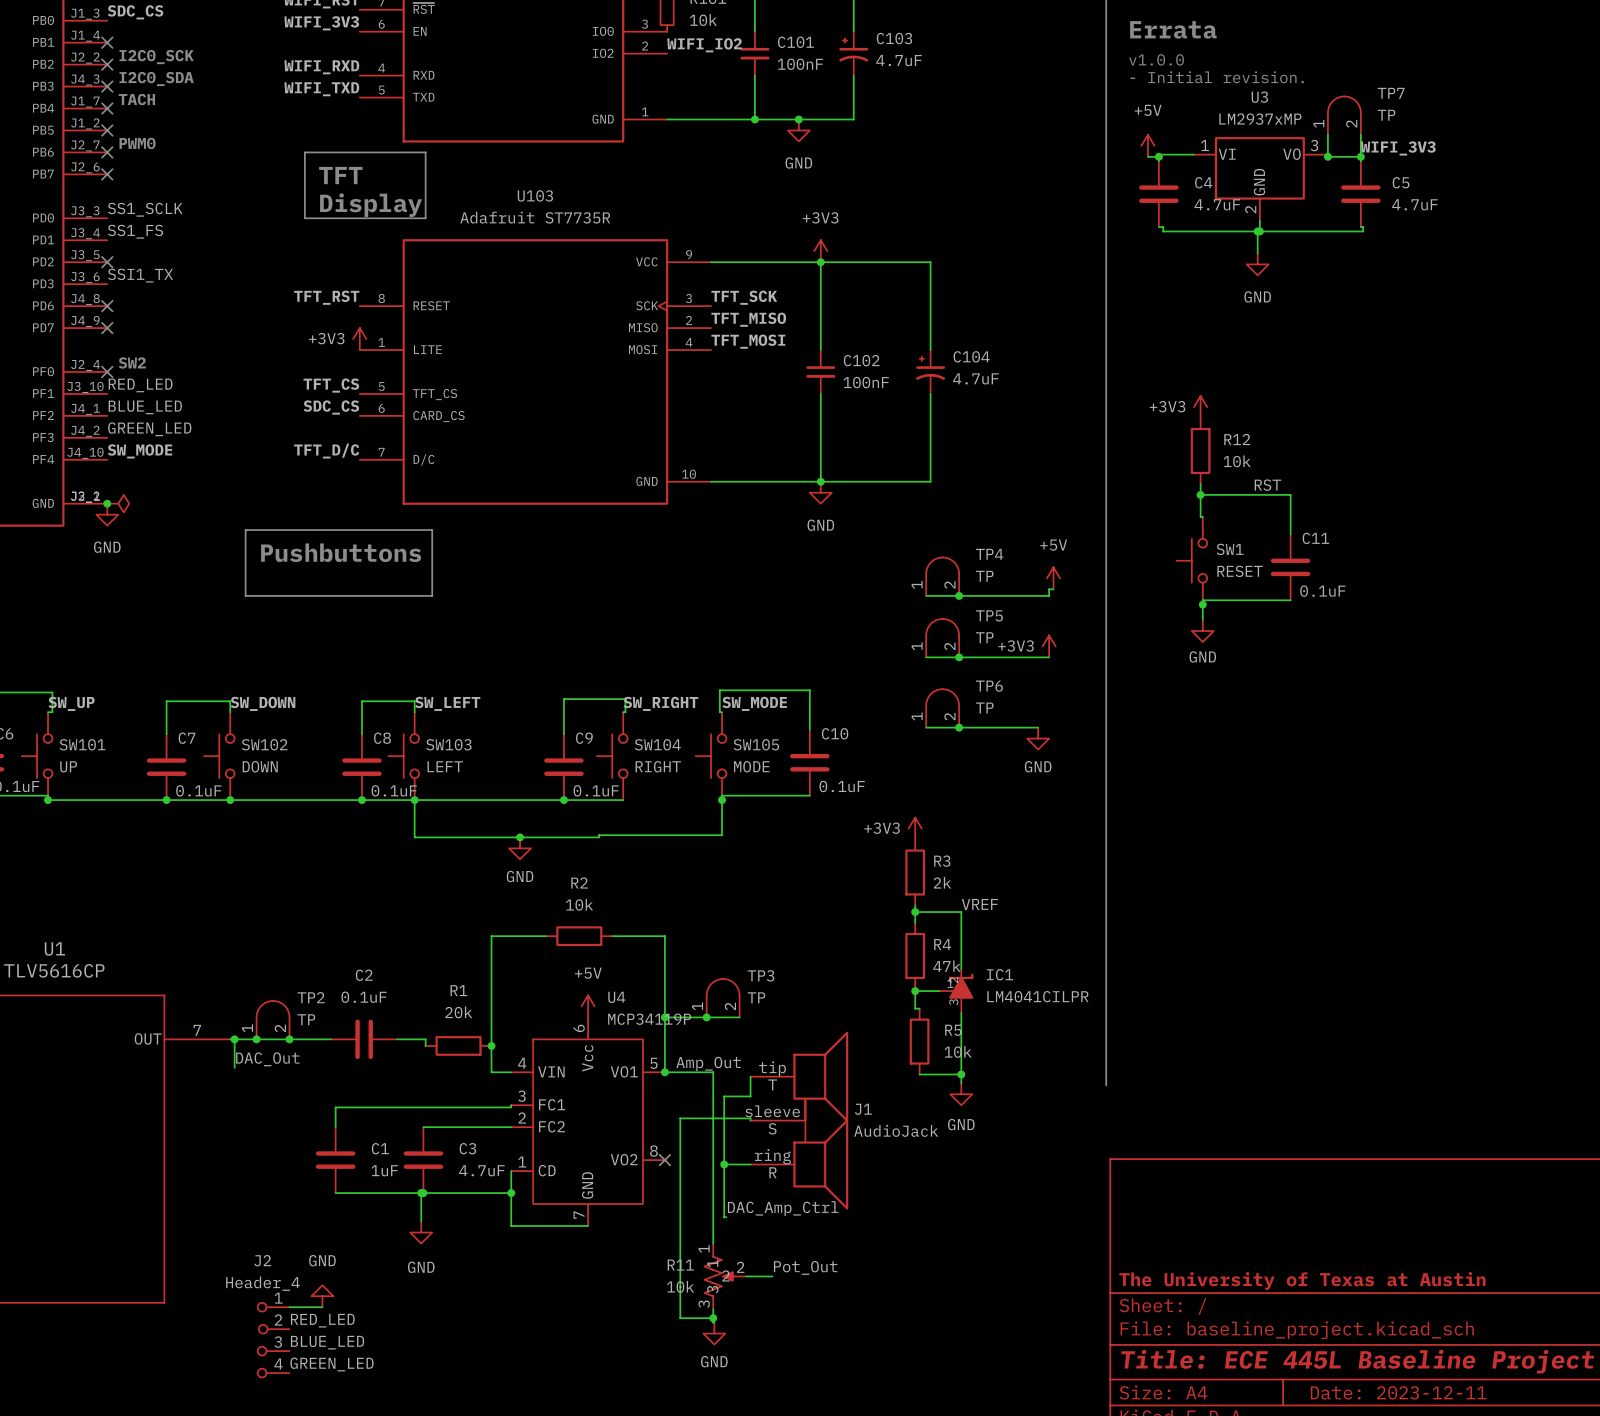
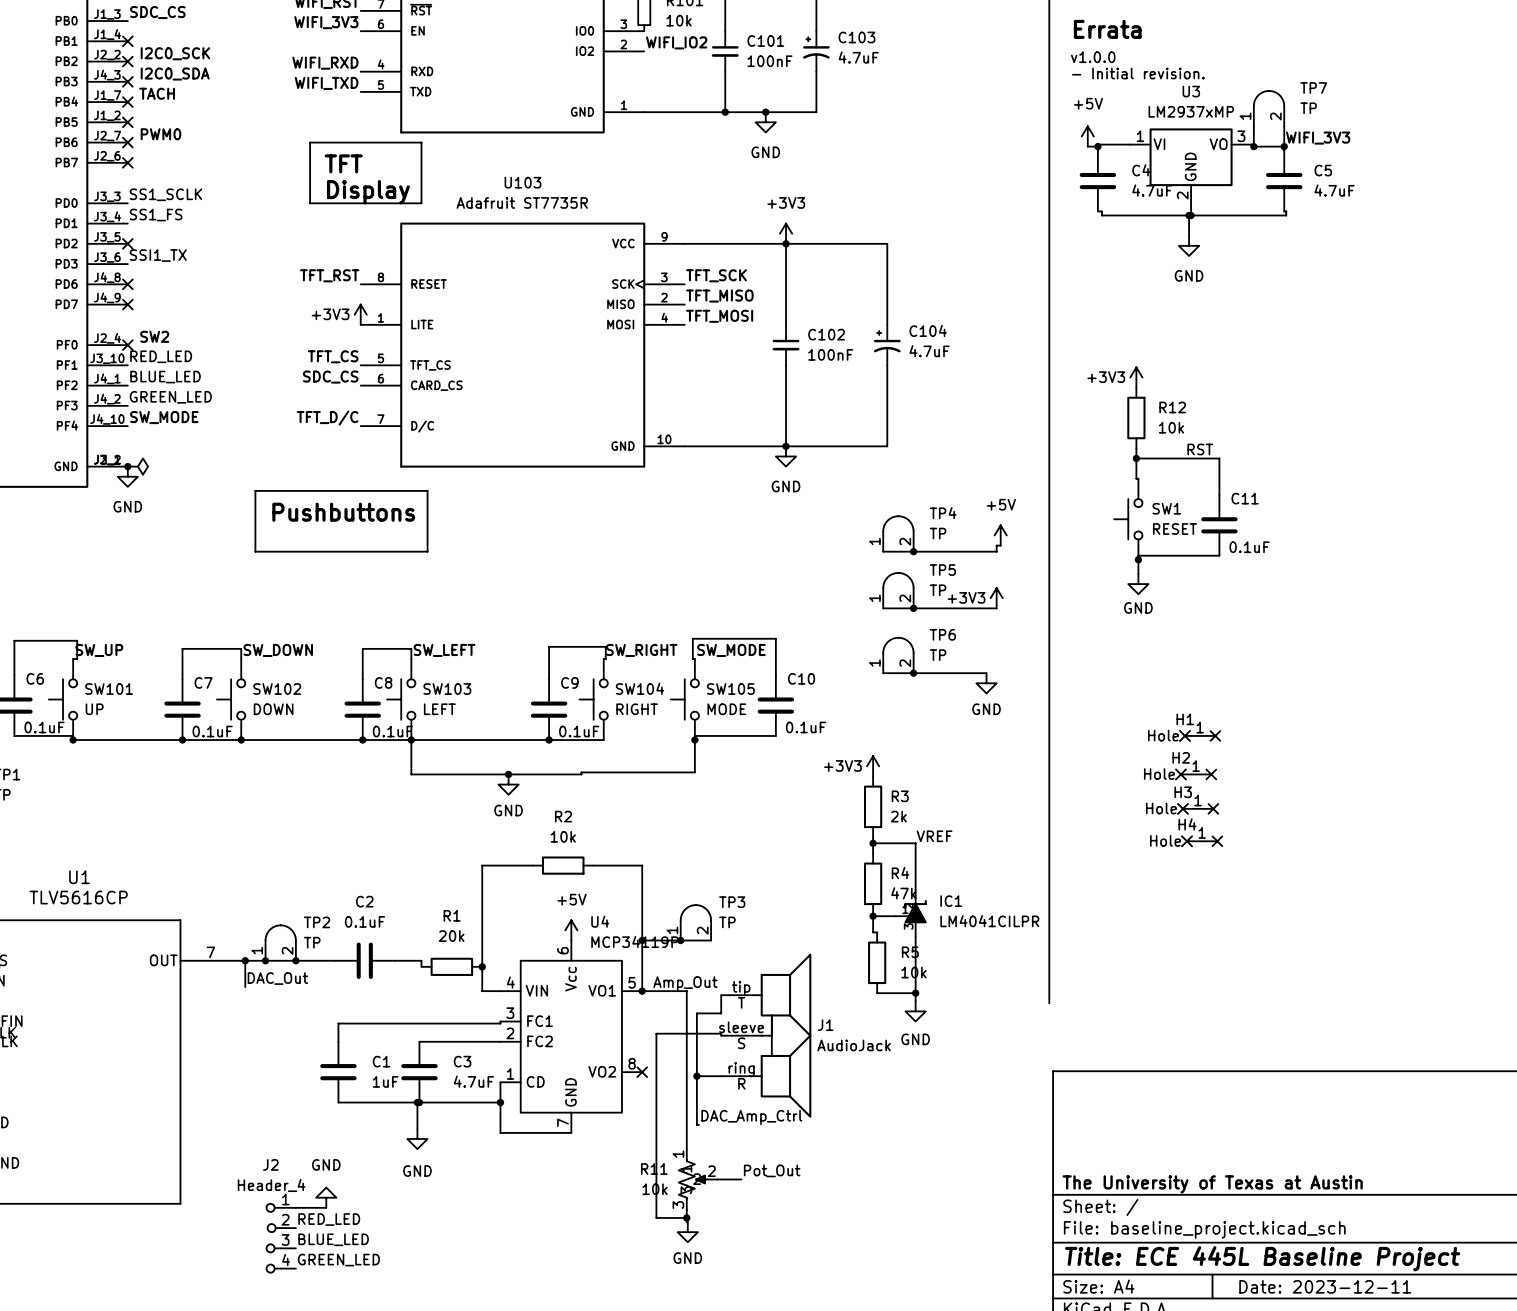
H1: none -> (1197, 735)
no-connect mark: none -> (1215, 735)
H2: none -> (1193, 774)
no-connect mark: none -> (1211, 774)
H3: none -> (1195, 808)
no-connect mark: none -> (1213, 808)
H4: none -> (1199, 841)
no-connect mark: none -> (1217, 841)

